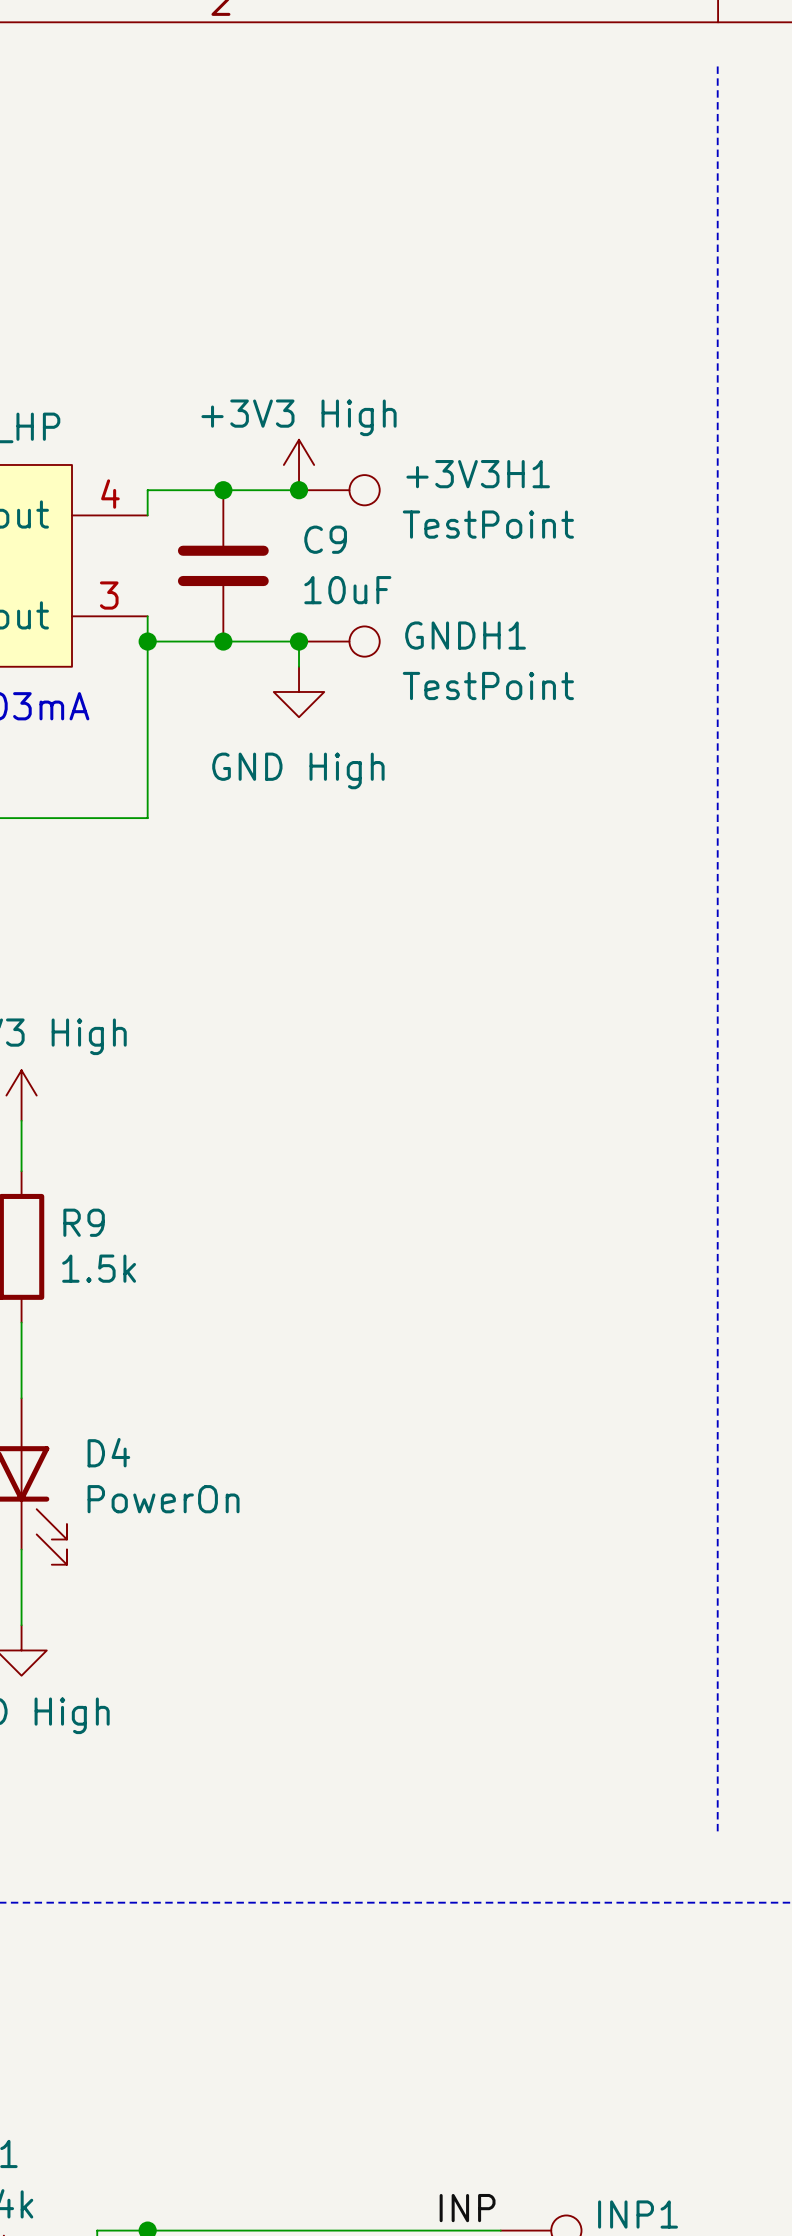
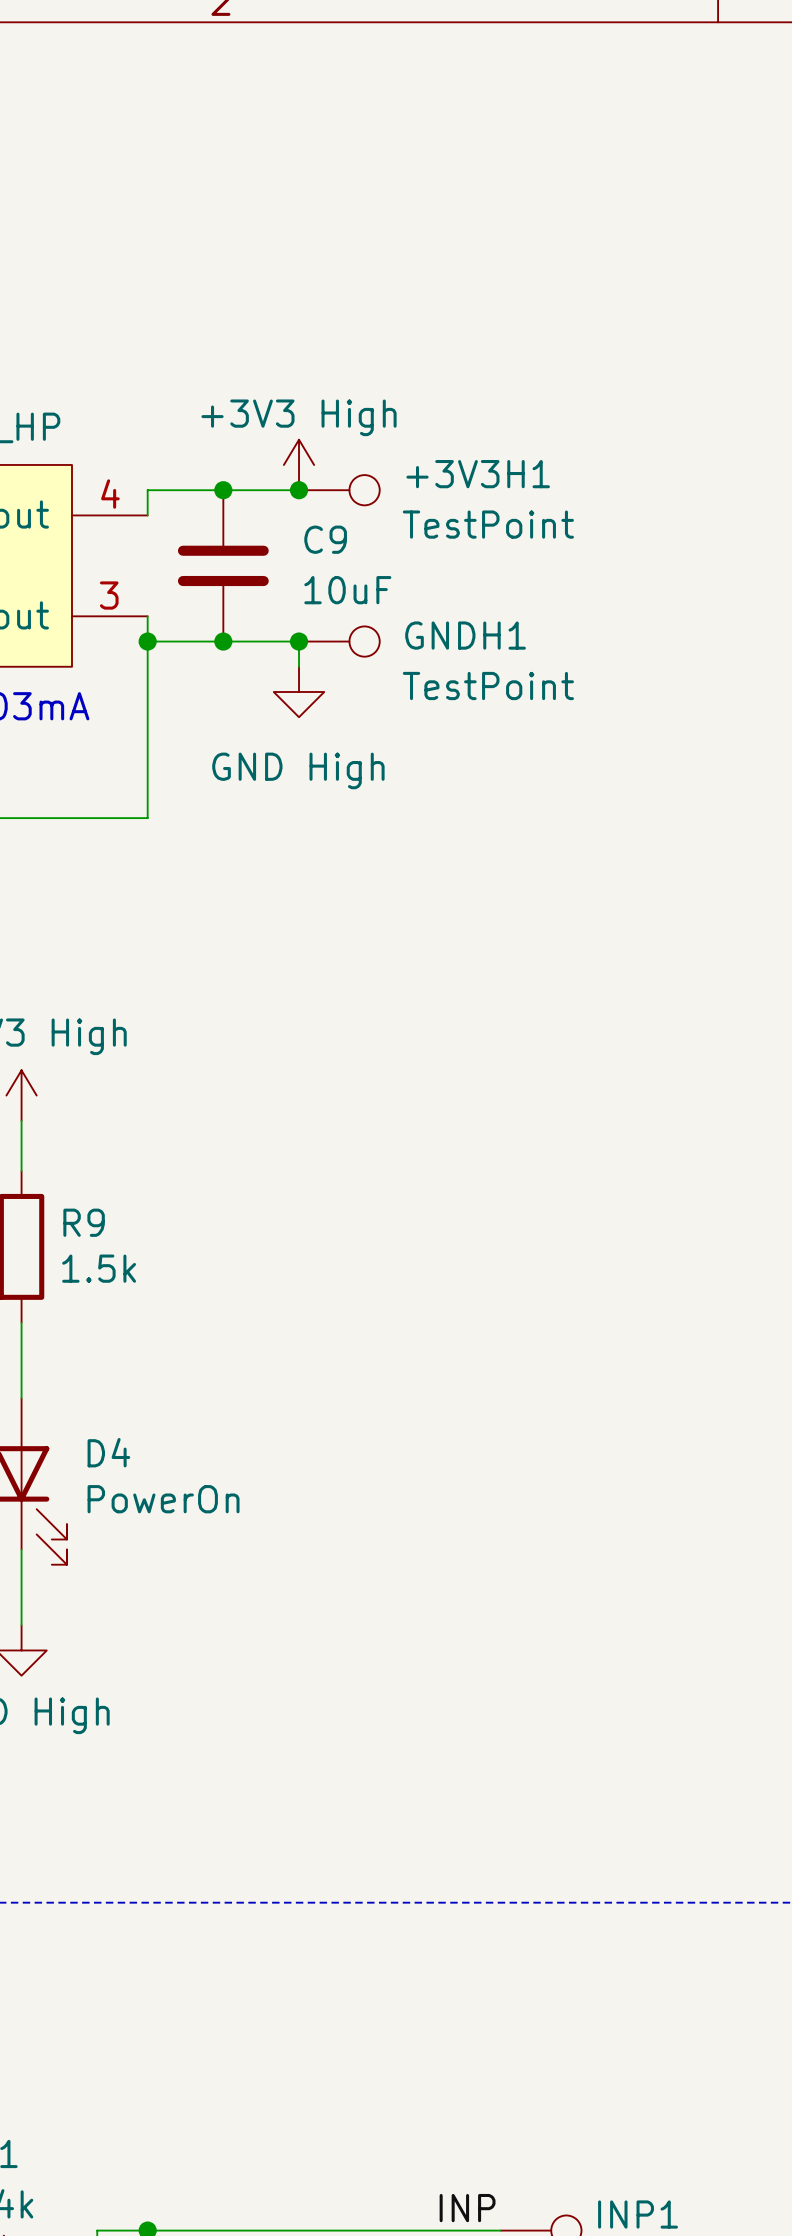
line: (717, 66) (717, 1832) -> none

